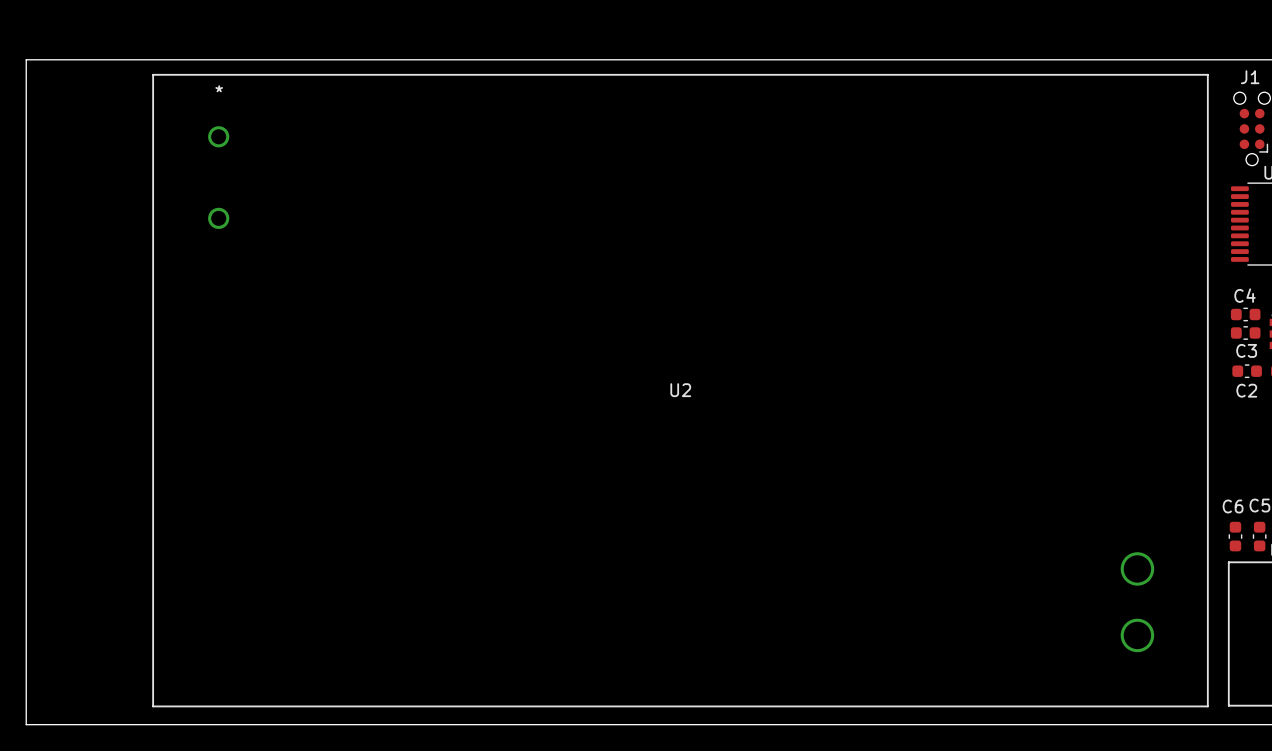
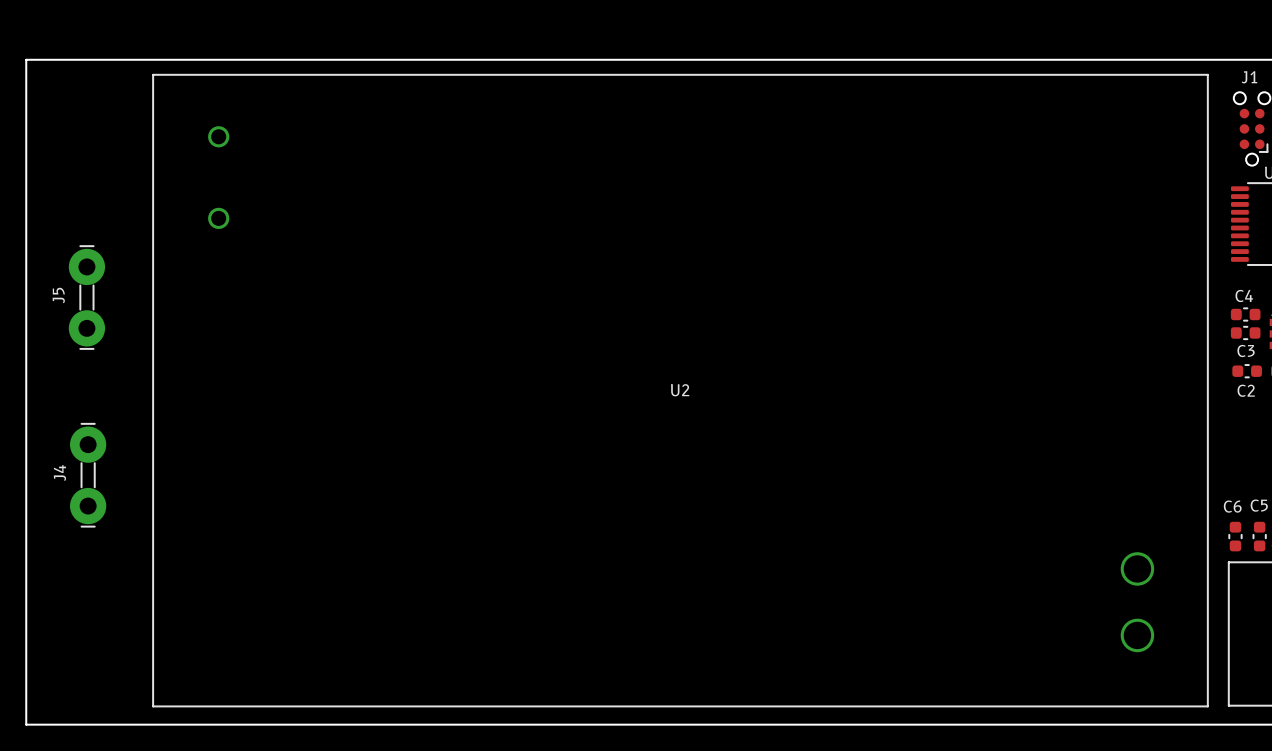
U2 text: * (219, 88) -> none
J5: none -> (86, 297)
J4: none -> (88, 475)

